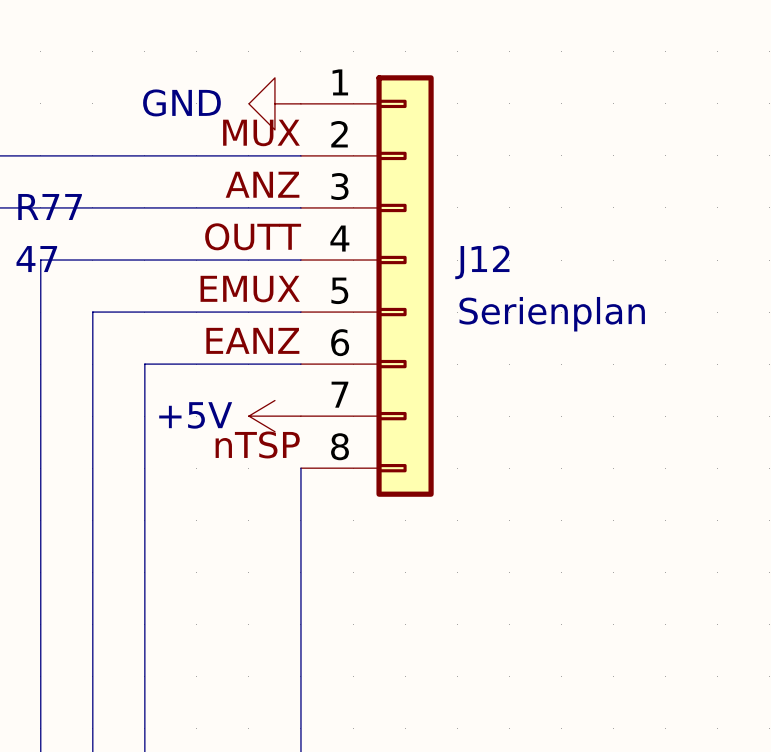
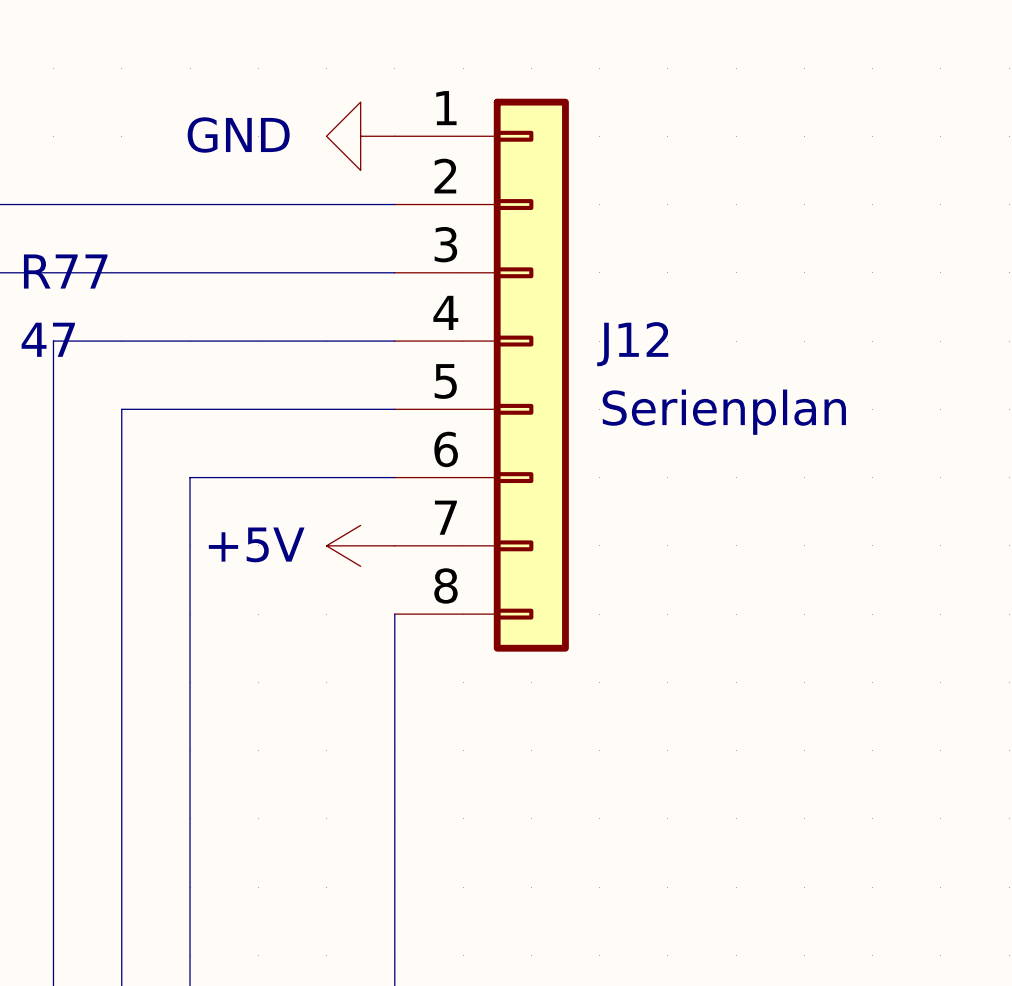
label: MUX (261, 132) -> none
label: ANZ (262, 184) -> none
label: OUTT (253, 236) -> none
label: EMUX (250, 289) -> none
label: EANZ (252, 340) -> none
label: nTSP (257, 444) -> none

